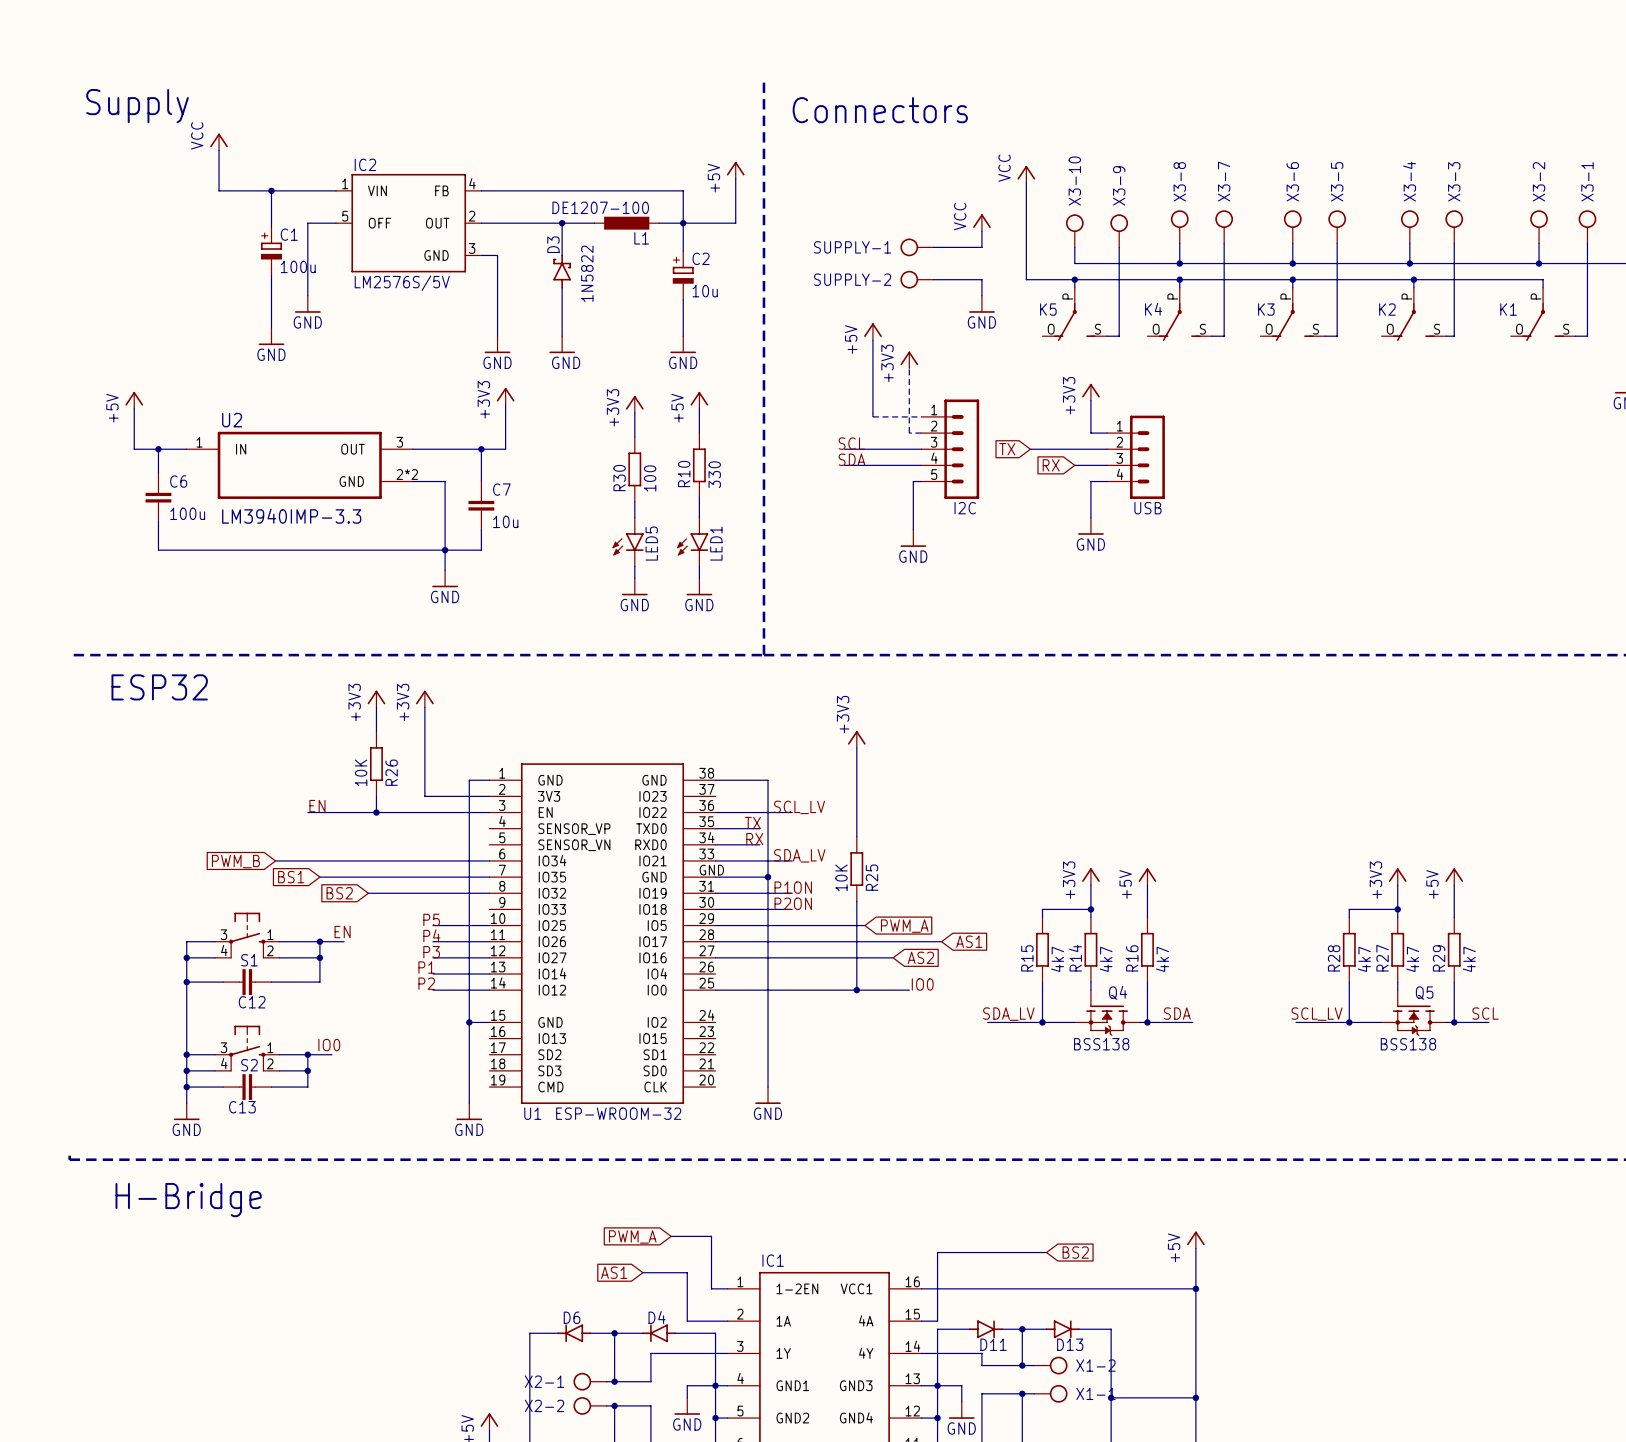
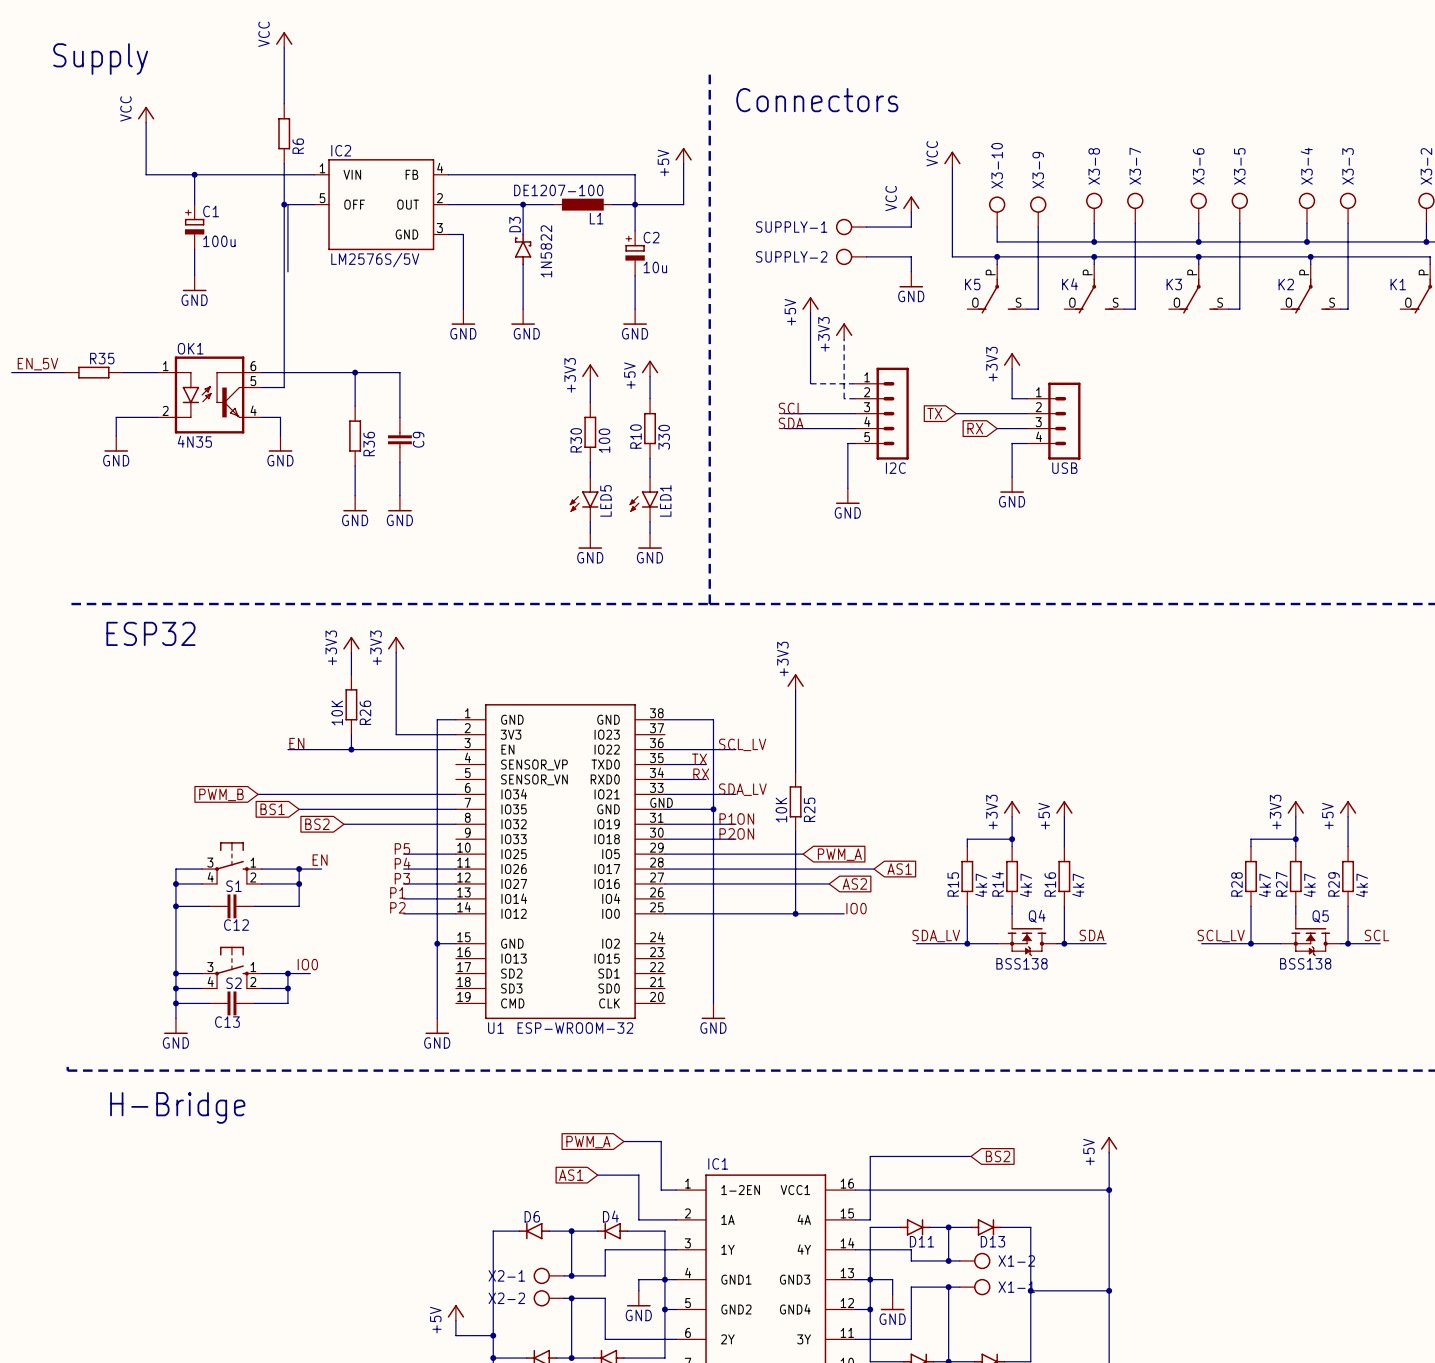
power symbol: none -> VCC (284, 40)
wire: none -> (284, 47) (284, 103)
text position: Supply (137, 106) -> Supply (100, 59)
power symbol: none -> VCC (146, 114)
power symbol: VCC (219, 142) -> none
R6: none -> (284, 133)
wire: (219, 150) (219, 190) -> (146, 122) (146, 174) (205, 174)
wire: none -> (284, 163) (284, 387) (261, 387)
wire: none -> (194, 174) (194, 204)
junction: none -> (194, 174)
wire: (271, 190) (271, 227) -> none
junction: (271, 190) -> none
junction: none -> (284, 204)
C1 position: (271, 251) -> (194, 227)
wire: none -> (194, 249) (194, 275)
wire: (271, 275) (271, 328) -> none
power symbol: GND (307, 304) -> none
power symbol: none -> GND (194, 283)
power symbol: GND (271, 336) -> none
label: none -> EN_5V (37, 364)
power symbol: +3V3 (505, 396) -> none
power symbol: +5V (134, 400) -> none
wire: none -> (11, 372) (63, 372)
R35: none -> (93, 372)
wire: none -> (123, 372) (157, 372)
wire: none -> (261, 372) (399, 372) (399, 417)
wire: none -> (355, 372) (355, 406)
junction: none -> (355, 372)
wire: (505, 404) (505, 449) (412, 449) -> none
wire: (134, 408) (134, 449) (186, 449) -> none
OK1: none -> 4N35 (209, 394)
wire: (158, 449) (158, 473) -> none
junction: (158, 449) -> none
wire: (481, 449) (481, 481) -> (355, 465) (355, 495)
junction: (481, 449) -> none
wire: none -> (157, 417) (116, 417) (116, 436)
wire: none -> (261, 417) (280, 417) (280, 436)
U2: LM3940IMP-3.3 (299, 465) -> none
R36: none -> (355, 436)
C9: none -> (399, 439)
power symbol: none -> GND (116, 443)
power symbol: none -> GND (280, 443)
wire: (412, 481) (445, 481) (445, 570) -> none
C6: 100u (158, 497) -> none
wire: none -> (399, 462) (399, 495)
C7: 10u (481, 505) -> none
wire: (158, 521) (158, 550) (481, 550) (481, 529) -> none
power symbol: none -> GND (355, 503)
power symbol: none -> GND (399, 503)
junction: (445, 550) -> none
power symbol: GND (445, 578) -> none

